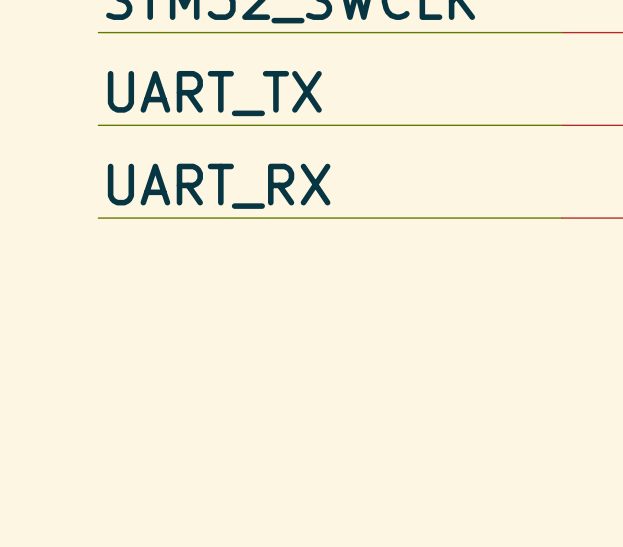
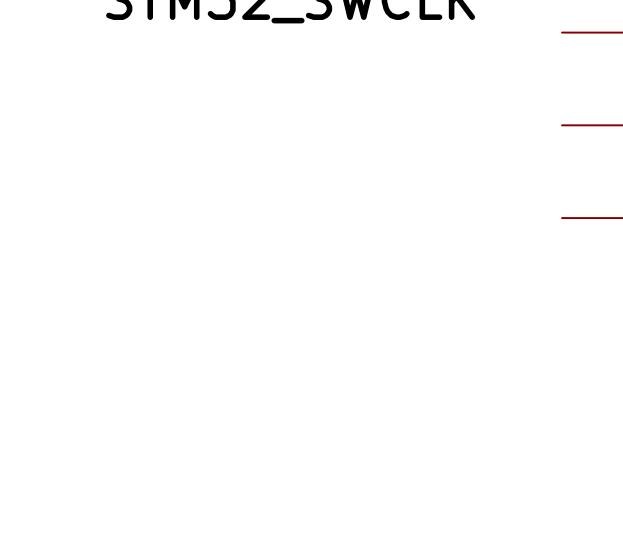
wire: (98, 32) (562, 32) -> none
label: UART_TX (214, 93) -> none
wire: (98, 125) (562, 125) -> none
label: UART_RX (219, 186) -> none
wire: (98, 218) (562, 218) -> none

